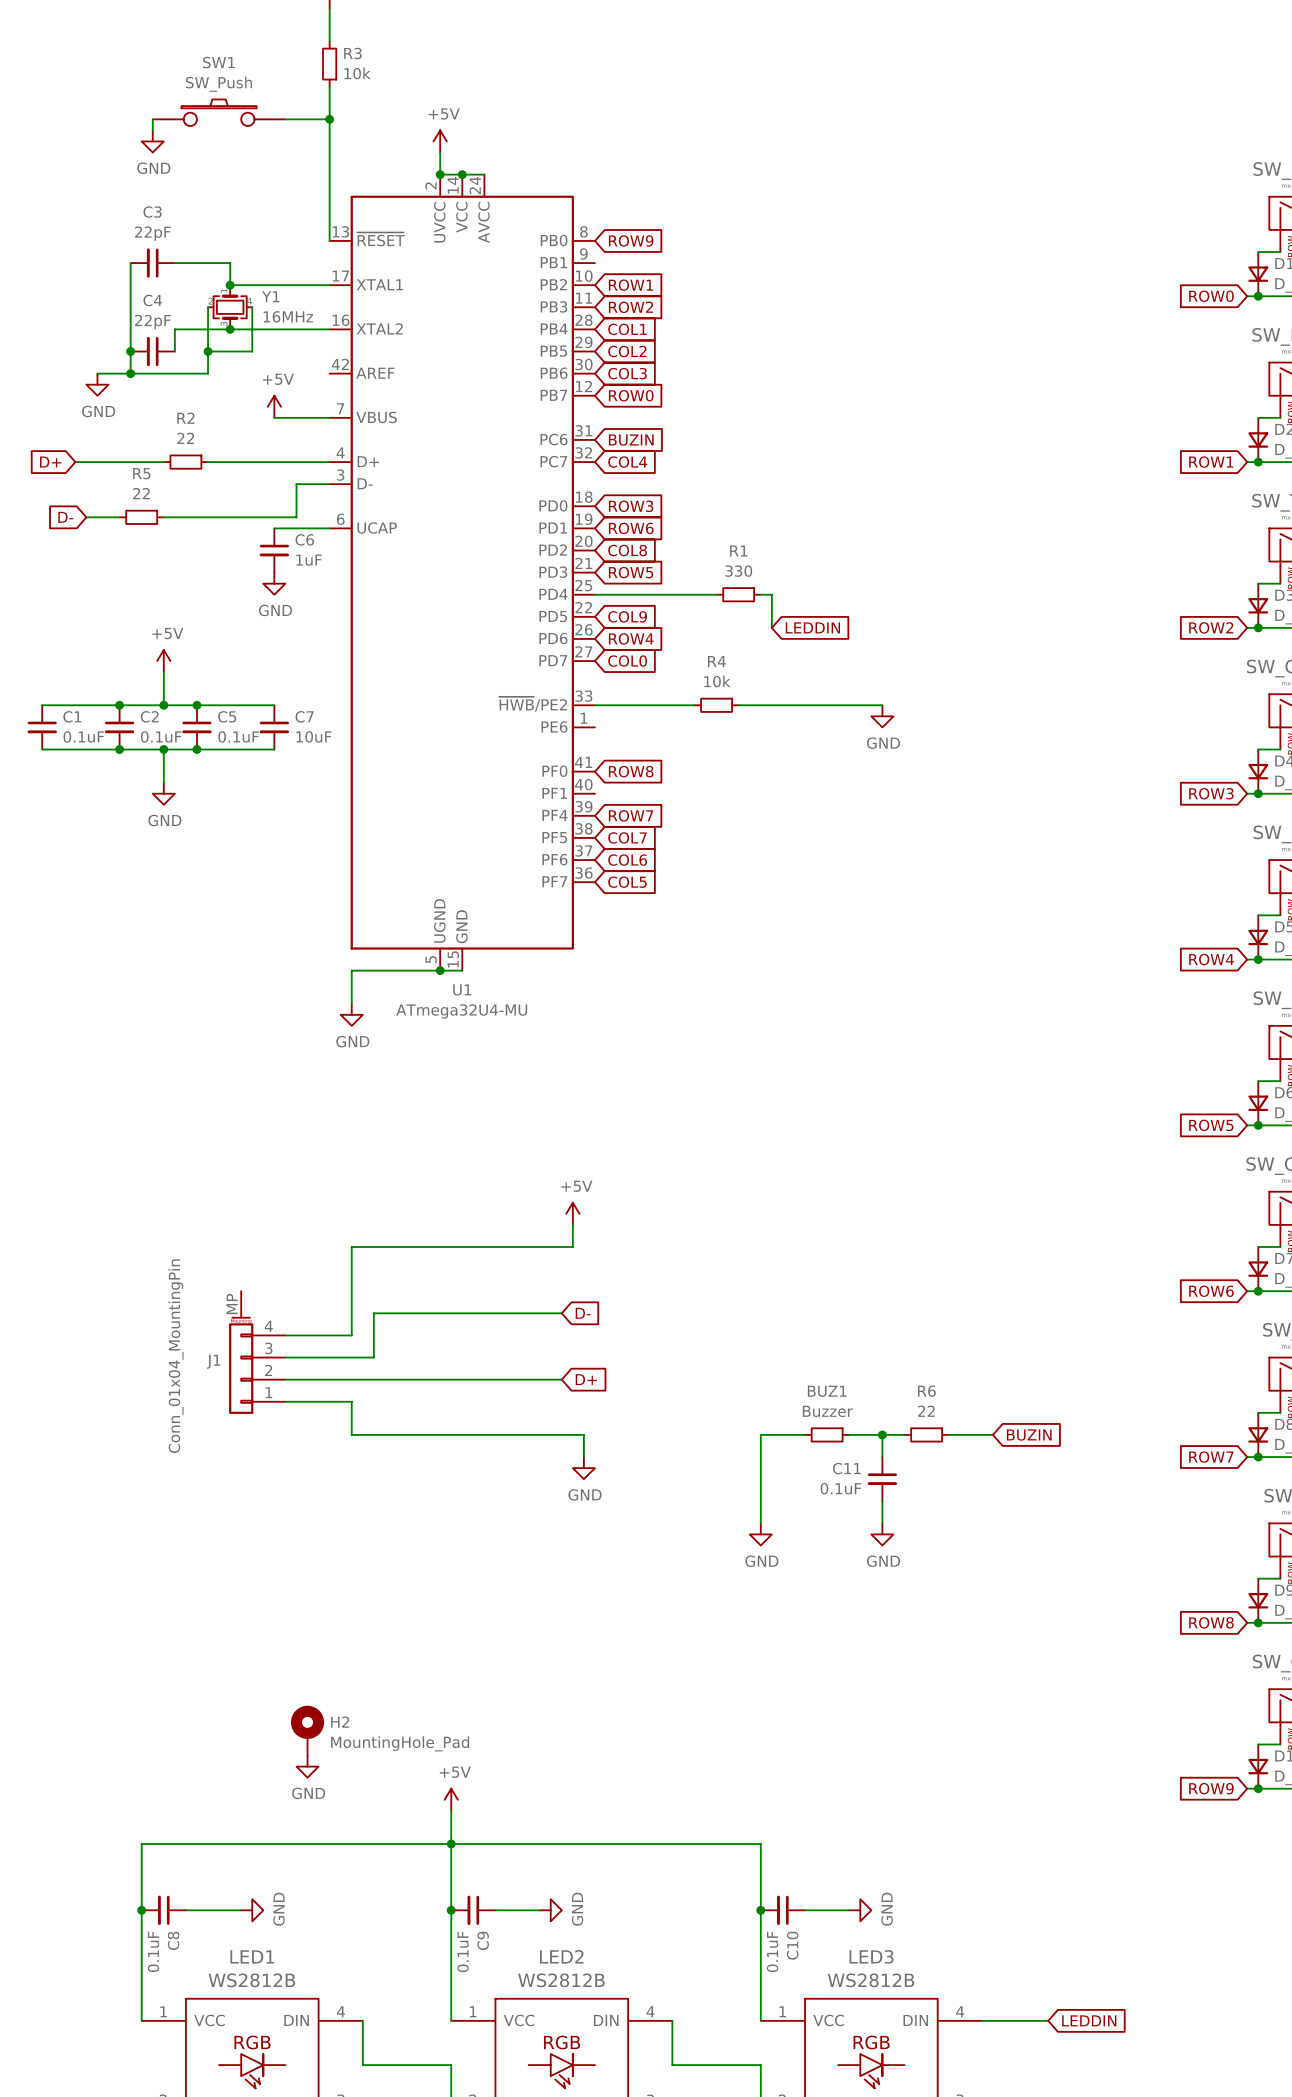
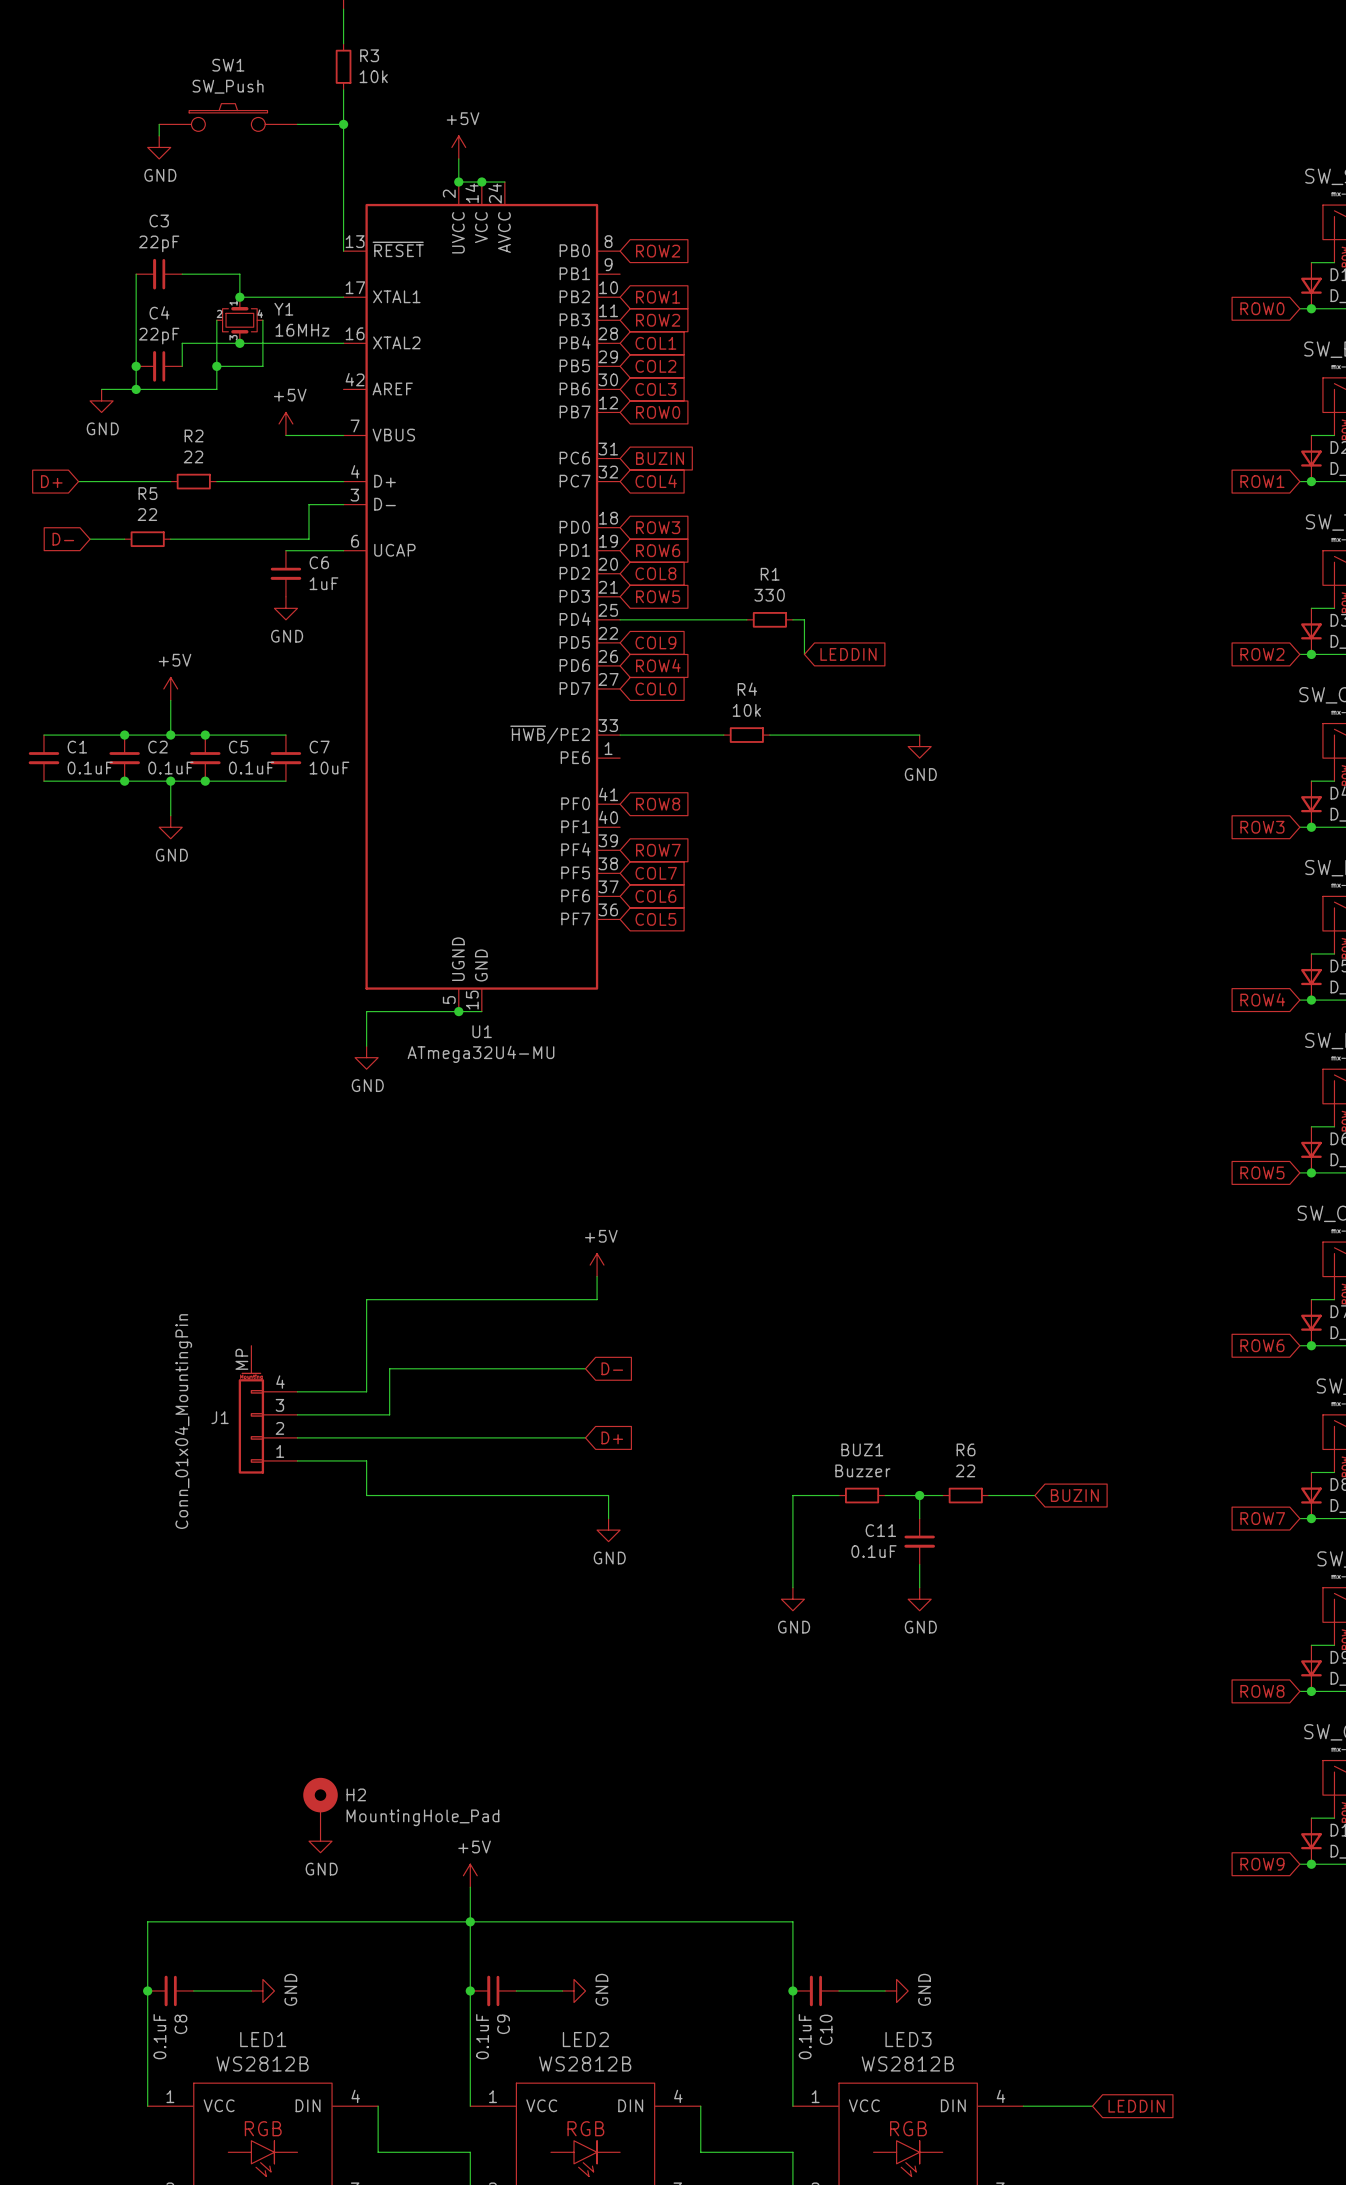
global label: ROW9 (631, 240) -> ROW2 (658, 251)

